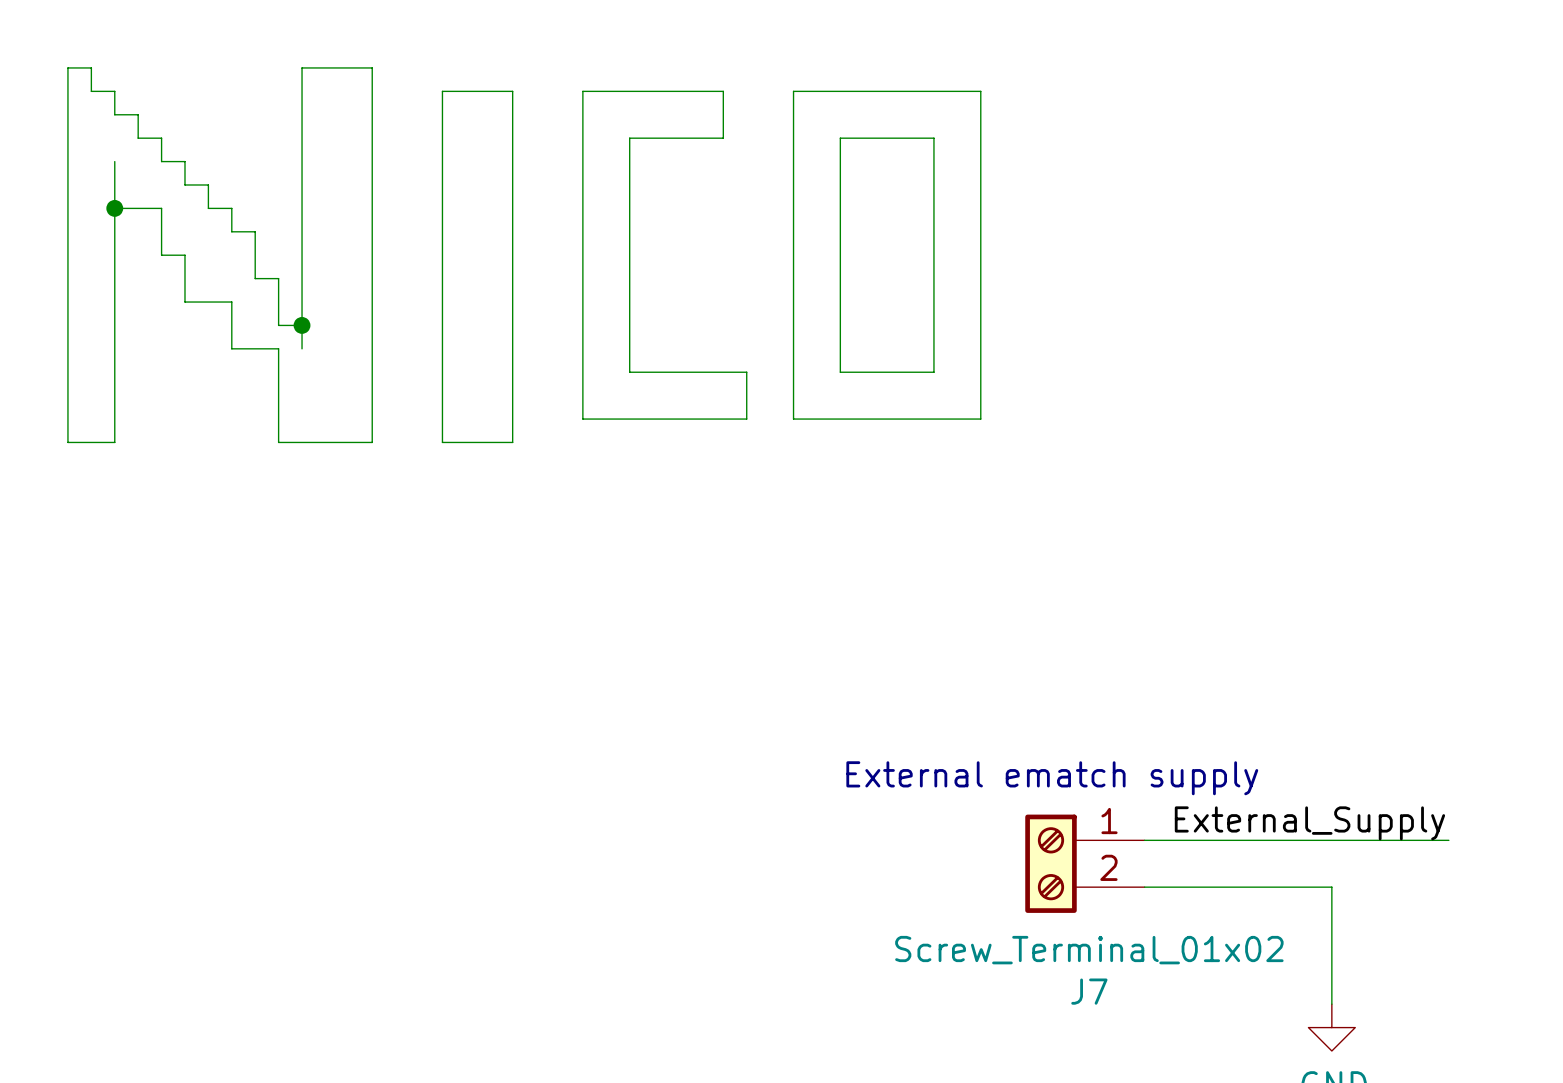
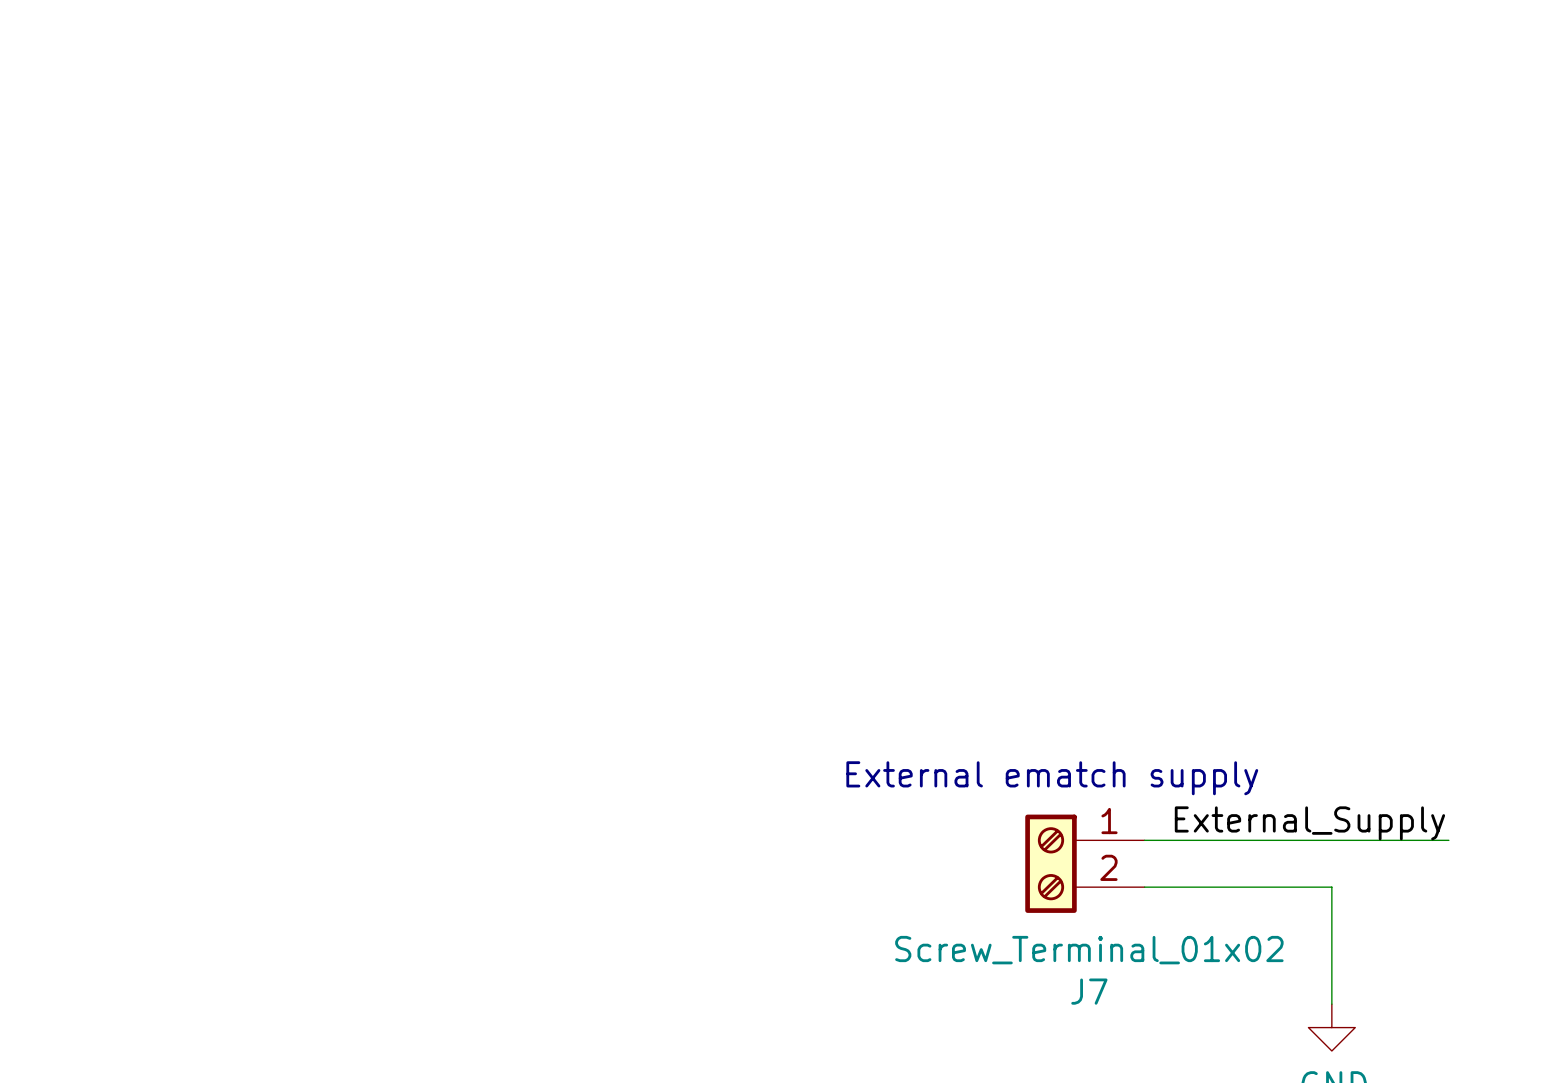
wire: (442, 91) (512, 91) (512, 442) (442, 442) (442, 91) -> none
wire: (582, 91) (723, 91) (723, 138) (629, 138) (629, 372) (746, 372) (746, 419) (582, 419) (582, 91) -> none
wire: (793, 91) (980, 91) (980, 419) (793, 419) (793, 91) -> none
wire: (840, 138) (933, 138) (933, 372) (840, 372) (840, 138) -> none
wire: (114, 161) (114, 442) (67, 442) (67, 67) (91, 67) (91, 91) (114, 91) (114, 114) (138, 114) (138, 138) (161, 138) (161, 161) (184, 161) (184, 184) (208, 184) (208, 208) (231, 208) (231, 231) (255, 231) (255, 278) (278, 278) (278, 325) (302, 325) -> none
wire: (114, 208) (161, 208) (161, 255) (184, 255) (184, 302) (231, 302) (231, 348) (278, 348) (278, 442) (372, 442) (372, 67) (302, 67) (302, 348) -> none
junction: (114, 208) -> none
junction: (302, 325) -> none

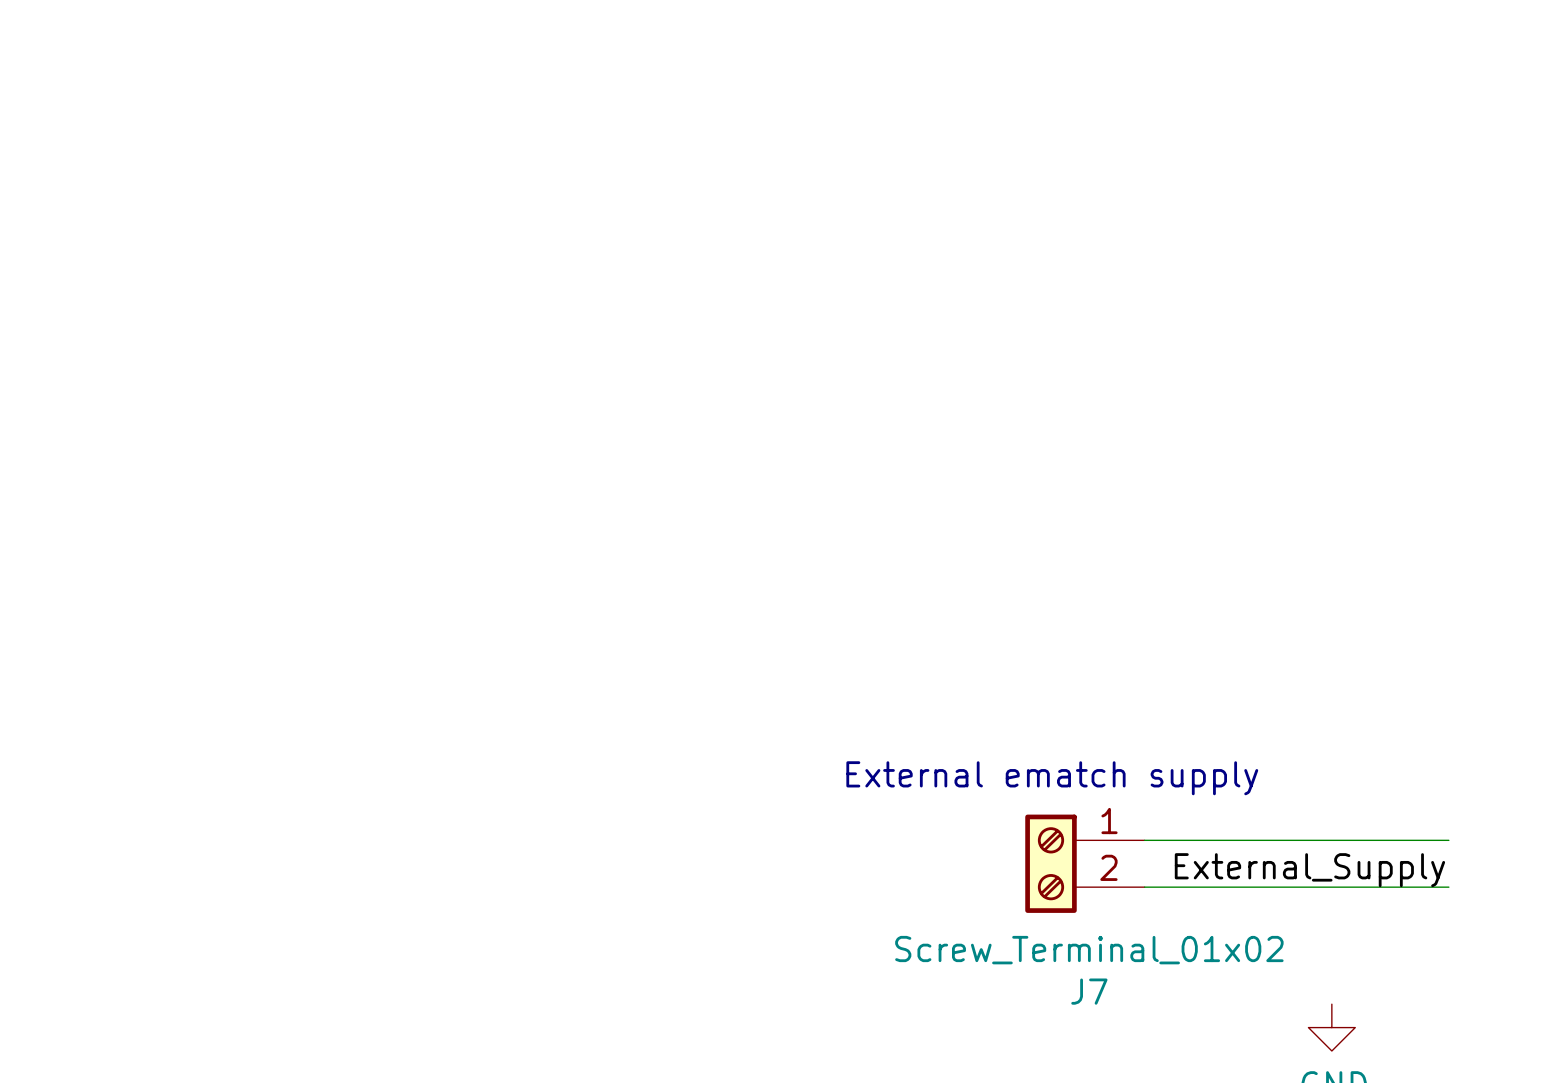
label position: External_Supply (1309, 823) -> External_Supply (1309, 870)
wire: (1331, 887) (1331, 1004) -> (1331, 887) (1448, 887)

